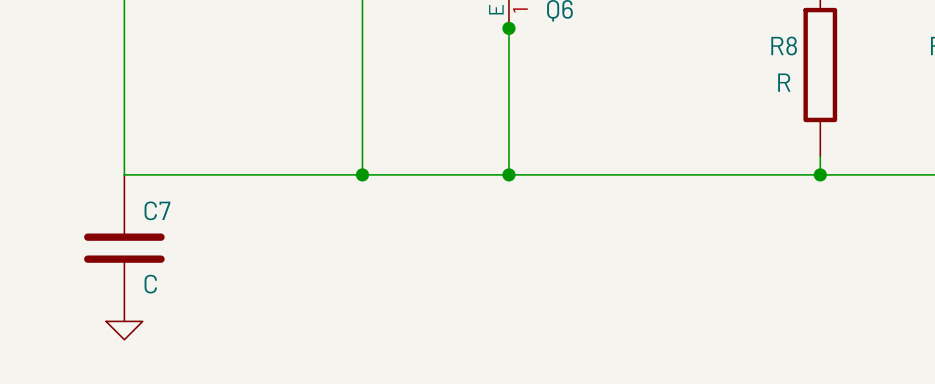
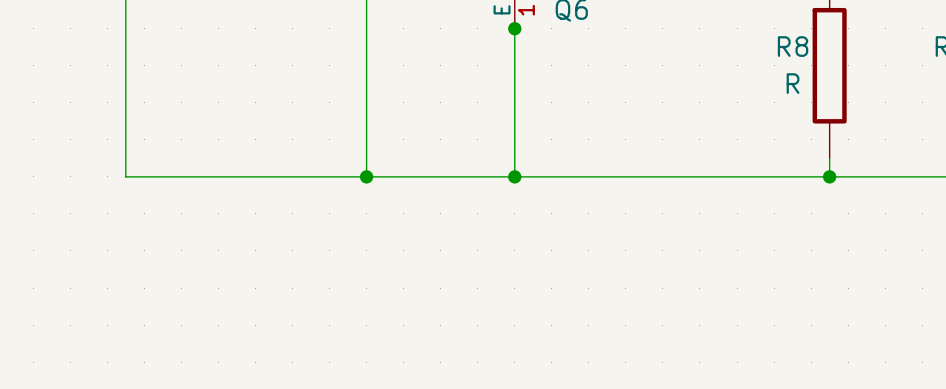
C7: C (124, 248) -> none
power symbol: (124, 330) -> none

